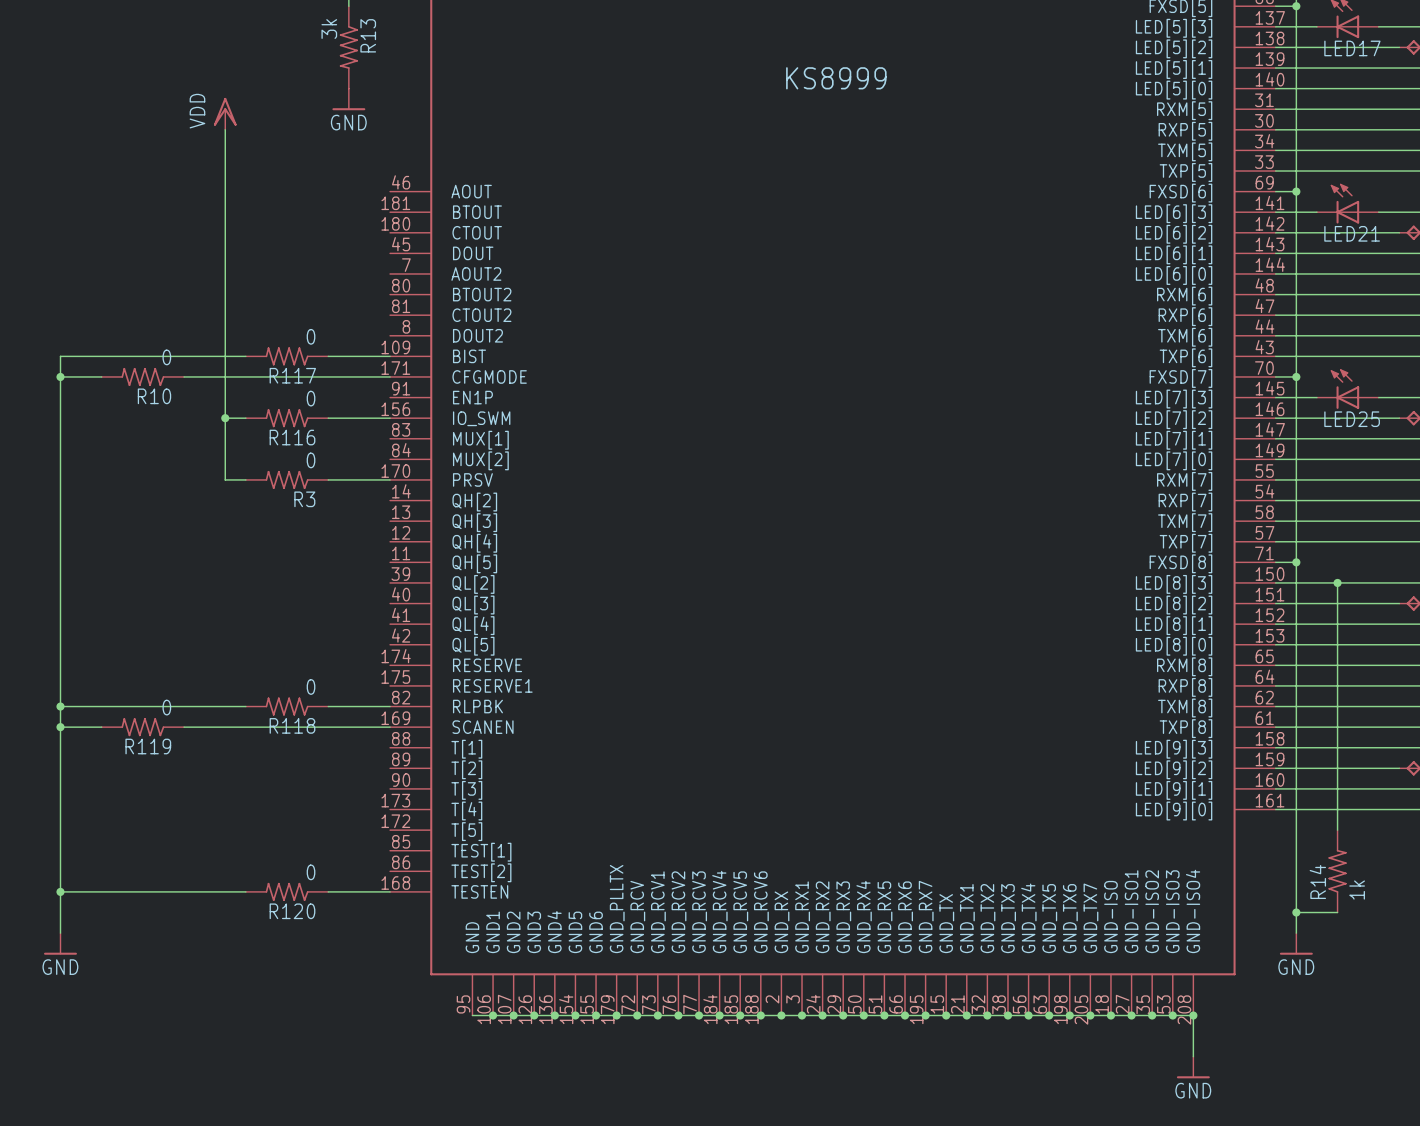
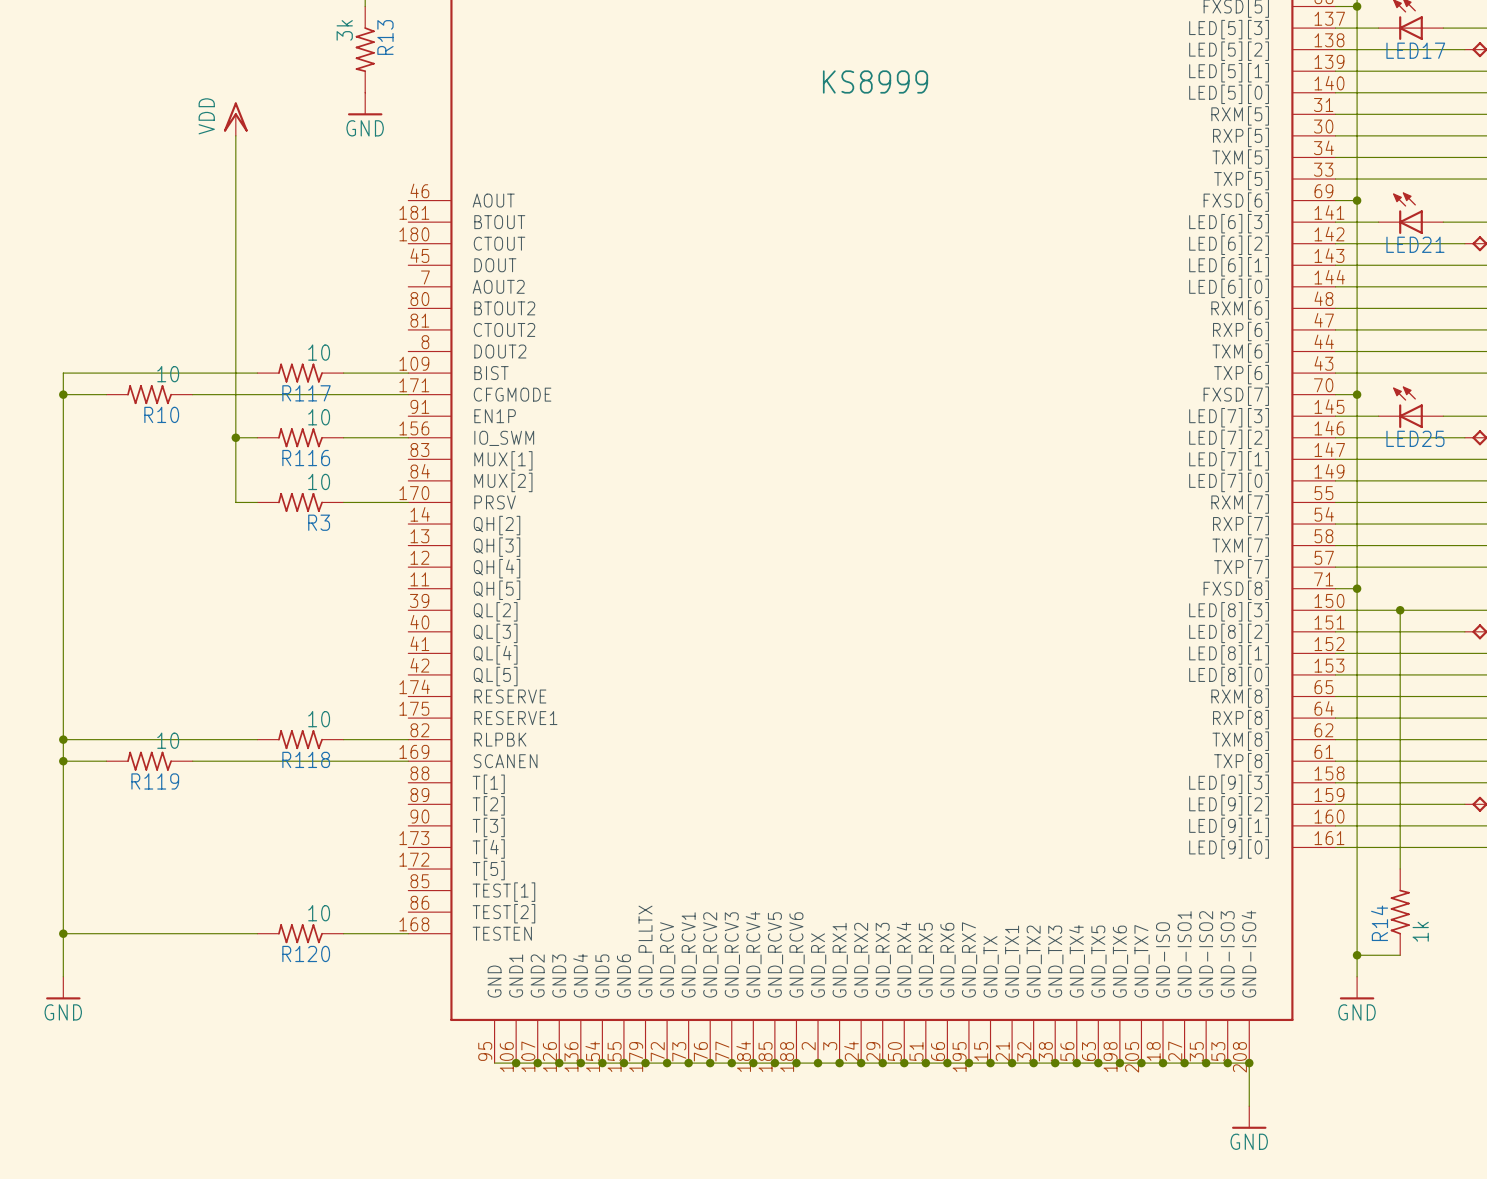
R117 value: 0 (311, 336) -> 10 (319, 352)
R10 value: 0 (166, 357) -> 10 (168, 374)
R116 value: 0 (311, 398) -> 10 (319, 417)
R3 value: 0 (311, 460) -> 10 (319, 481)
R118 value: 0 (311, 686) -> 10 (319, 719)
R119 value: 0 (166, 707) -> 10 (168, 740)
R120 value: 0 (311, 872) -> 10 (319, 913)

